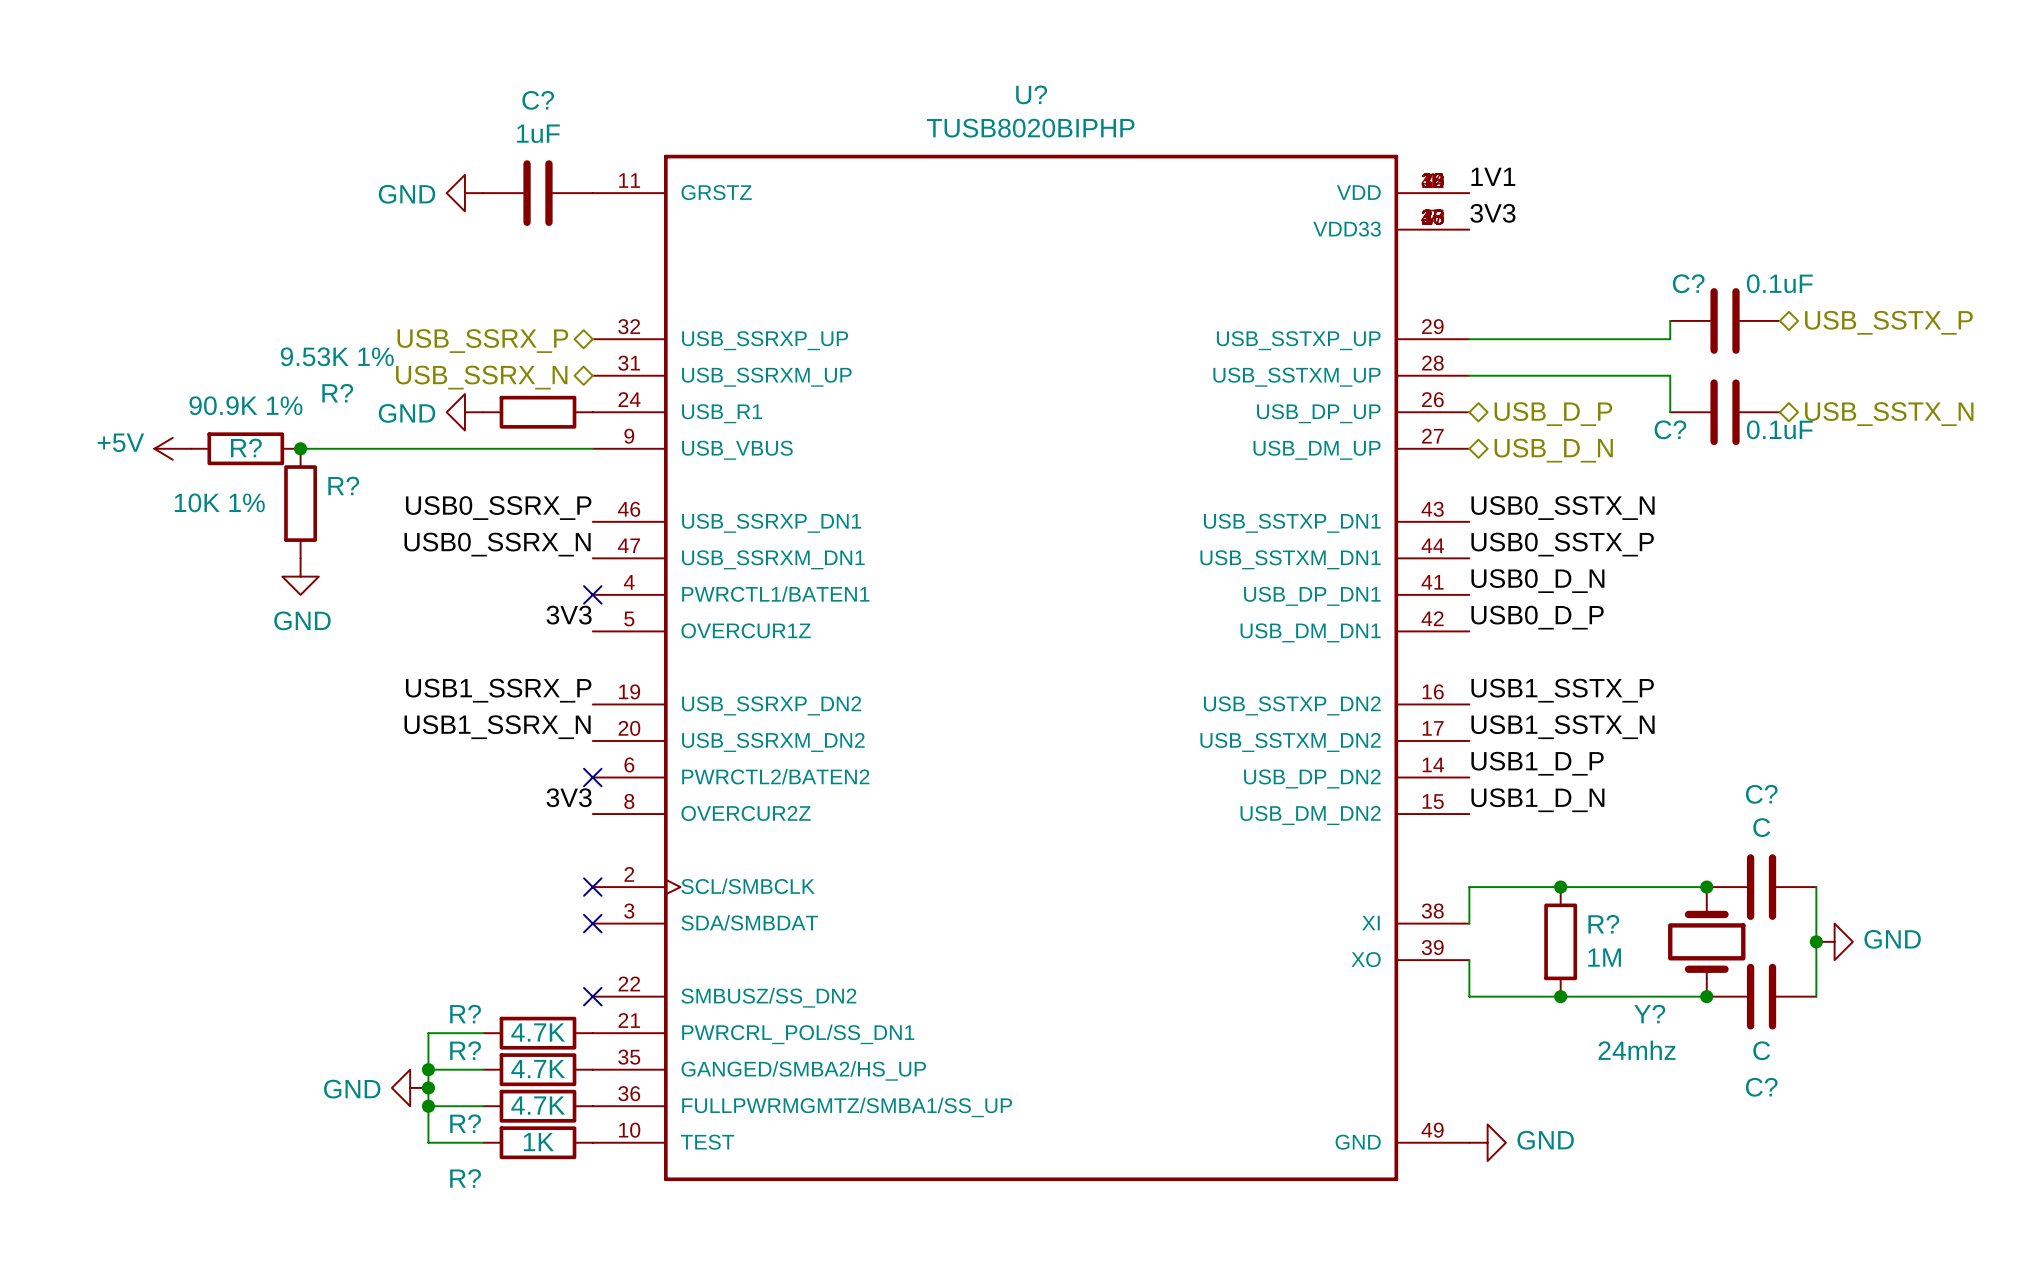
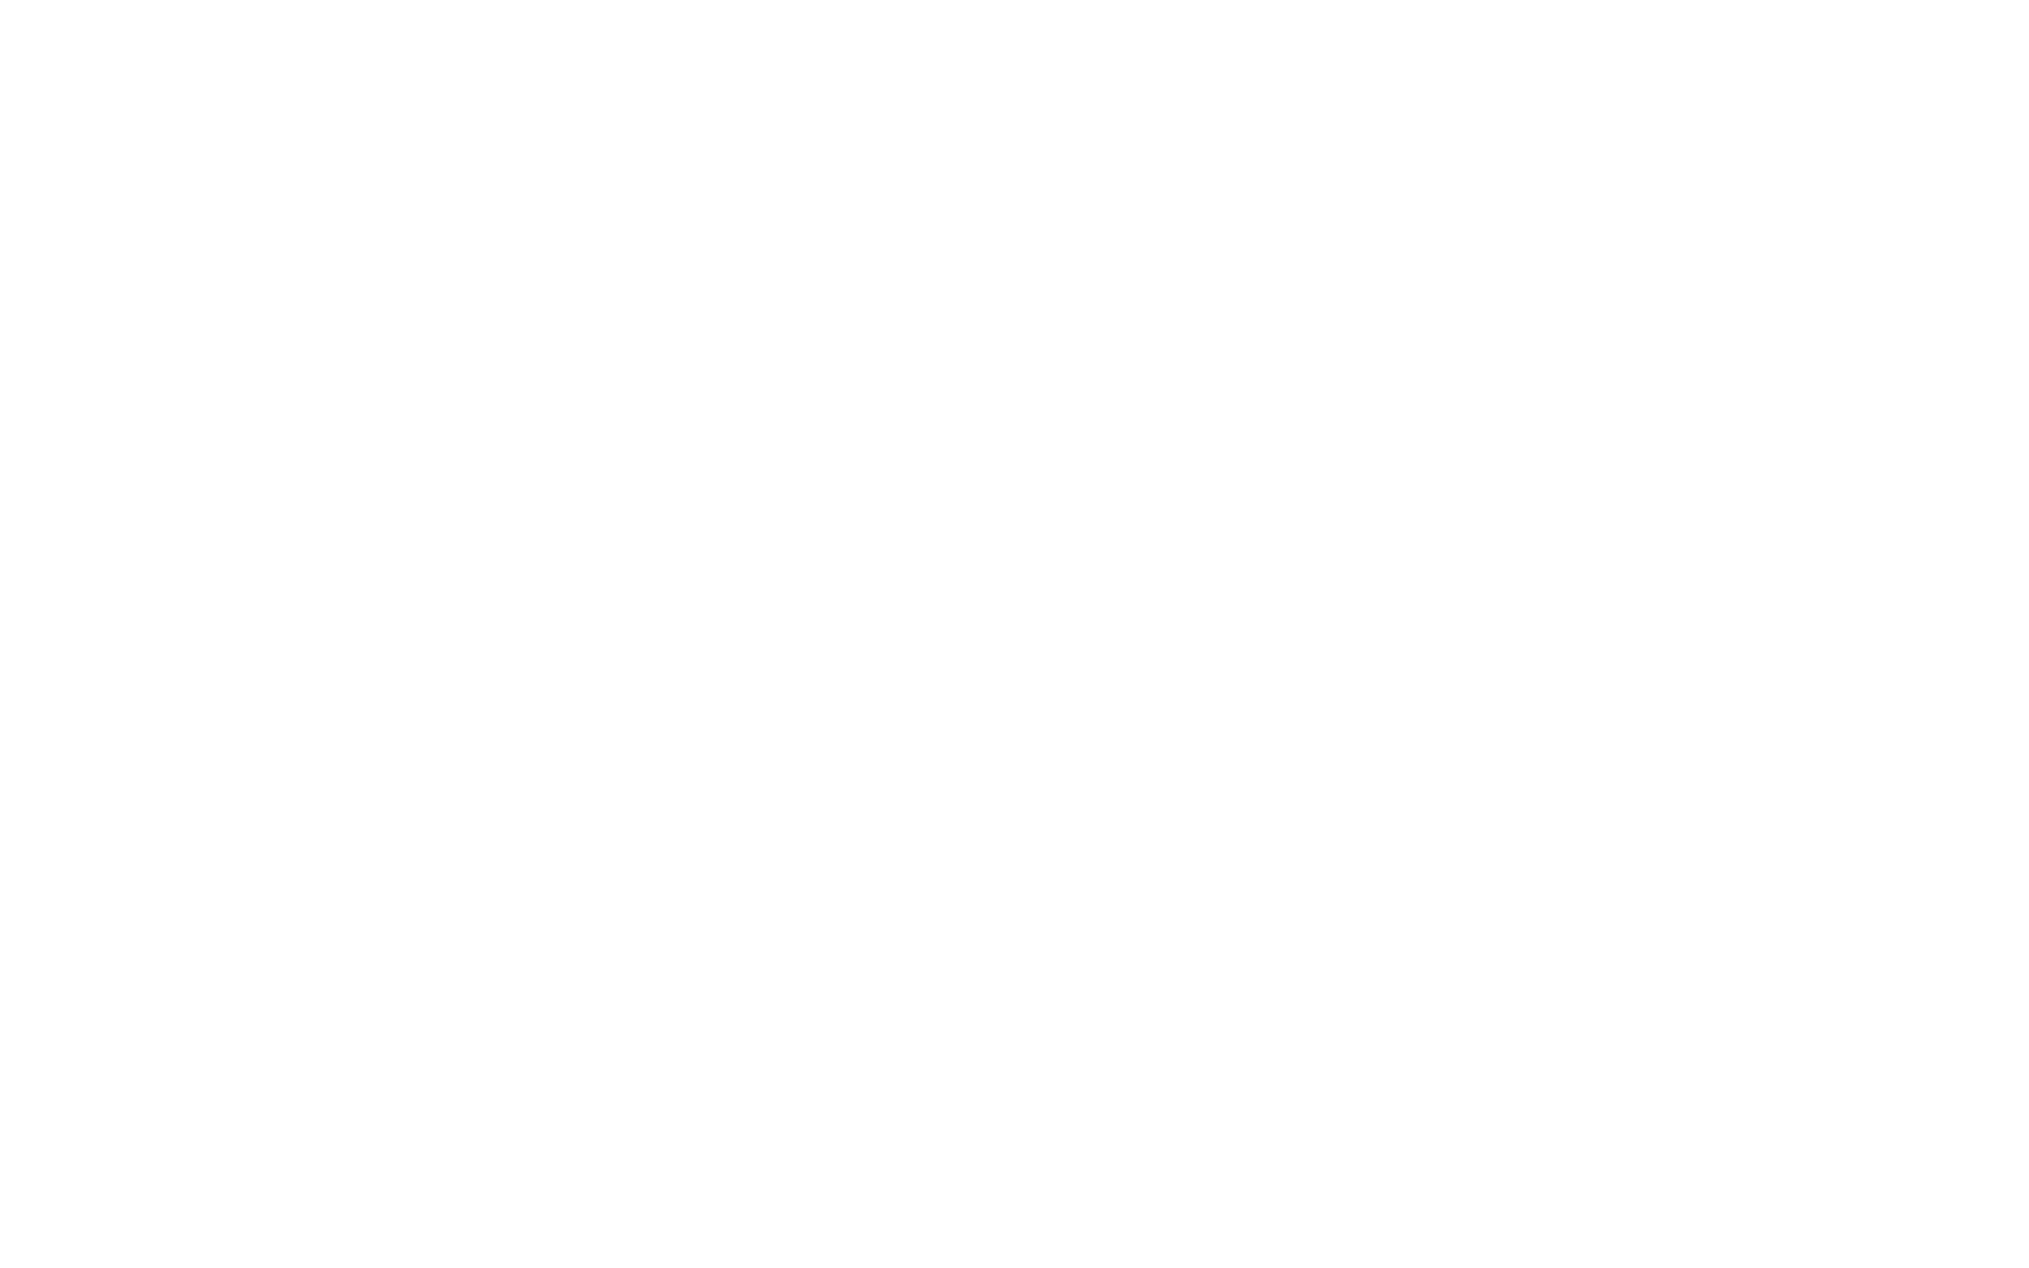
label: 1V1 (1493, 176) -> none
power symbol: GND (464, 193) -> none
C?: 1uF (538, 193) -> none
label: 3V3 (1492, 213) -> none
wire: (1670, 320) (1670, 339) (1469, 339) -> none
C?: 0.1uF (1725, 320) -> none
hierarchical label: USB_SSTX_P (1888, 322) -> none
hierarchical label: USB_SSRX_P (482, 341) -> none
wire: (1469, 375) (1670, 375) (1670, 412) -> none
hierarchical label: USB_SSRX_N (481, 377) -> none
power symbol: GND (464, 412) -> none
R?: 9.53K 1% (538, 412) -> none
C?: 0.1uF (1725, 412) -> none
hierarchical label: USB_D_P (1553, 414) -> none
hierarchical label: USB_SSTX_N (1889, 414) -> none
power symbol: +5V (172, 448) -> none
R?: 90.9K 1% (245, 448) -> none
wire: (300, 448) (592, 448) -> none
junction: (300, 448) -> none
hierarchical label: USB_D_N (1553, 450) -> none
R?: 10K 1% (300, 503) -> none
label: USB0_SSRX_P (498, 508) -> none
label: USB0_SSTX_N (1562, 508) -> none
label: USB0_SSRX_N (497, 544) -> none
label: USB0_SSTX_P (1562, 544) -> none
power symbol: GND (300, 576) -> none
label: USB0_D_N (1537, 581) -> none
no-connect mark: (592, 594) -> none
label: 3V3 (569, 615) -> none
label: USB0_D_P (1537, 617) -> none
U?: TUSB8020BIPHP (1031, 667) -> none
label: USB1_SSRX_P (498, 690) -> none
label: USB1_SSTX_P (1562, 690) -> none
label: USB1_SSRX_N (497, 727) -> none
label: USB1_SSTX_N (1562, 727) -> none
label: USB1_D_P (1537, 763) -> none
no-connect mark: (592, 777) -> none
label: 3V3 (569, 797) -> none
label: USB1_D_N (1537, 800) -> none
no-connect mark: (592, 887) -> none
junction: (1560, 887) -> none
wire: (1706, 887) (1469, 887) (1469, 923) -> none
junction: (1706, 887) -> none
C?: C (1761, 887) -> none
wire: (1816, 887) (1816, 996) -> none
no-connect mark: (592, 923) -> none
R?: 1M (1560, 941) -> none
Y?: 24mhz (1706, 941) -> none
junction: (1816, 941) -> none
power symbol: GND (1834, 941) -> none
wire: (1469, 960) (1469, 996) (1706, 996) -> none
no-connect mark: (592, 996) -> none
junction: (1560, 996) -> none
junction: (1706, 996) -> none
C?: C (1761, 996) -> none
wire: (483, 1033) (428, 1033) (428, 1142) (483, 1142) -> none
R?: 4.7K (538, 1033) -> none
wire: (428, 1069) (483, 1069) -> none
junction: (428, 1069) -> none
R?: 4.7K (538, 1069) -> none
power symbol: GND (410, 1087) -> none
junction: (428, 1087) -> none
wire: (428, 1106) (483, 1106) -> none
junction: (428, 1106) -> none
R?: 4.7K (538, 1106) -> none
R?: 1K (538, 1142) -> none
power symbol: GND (1487, 1142) -> none

